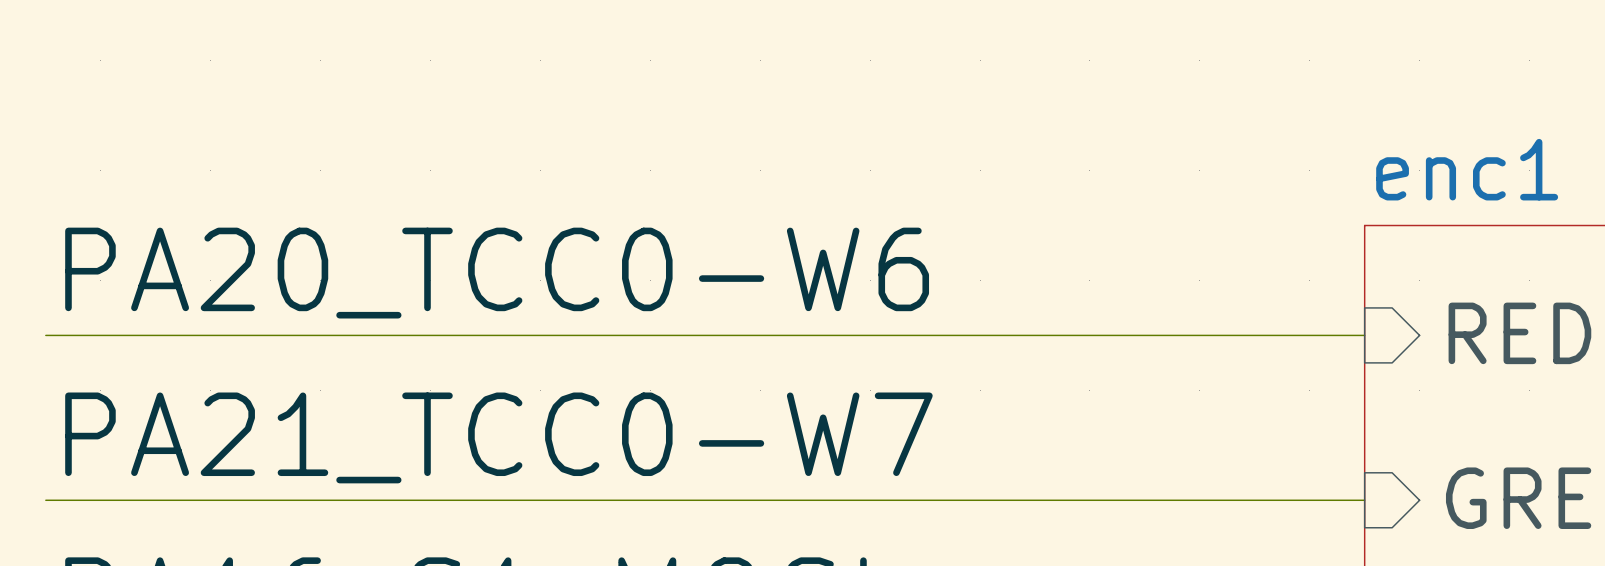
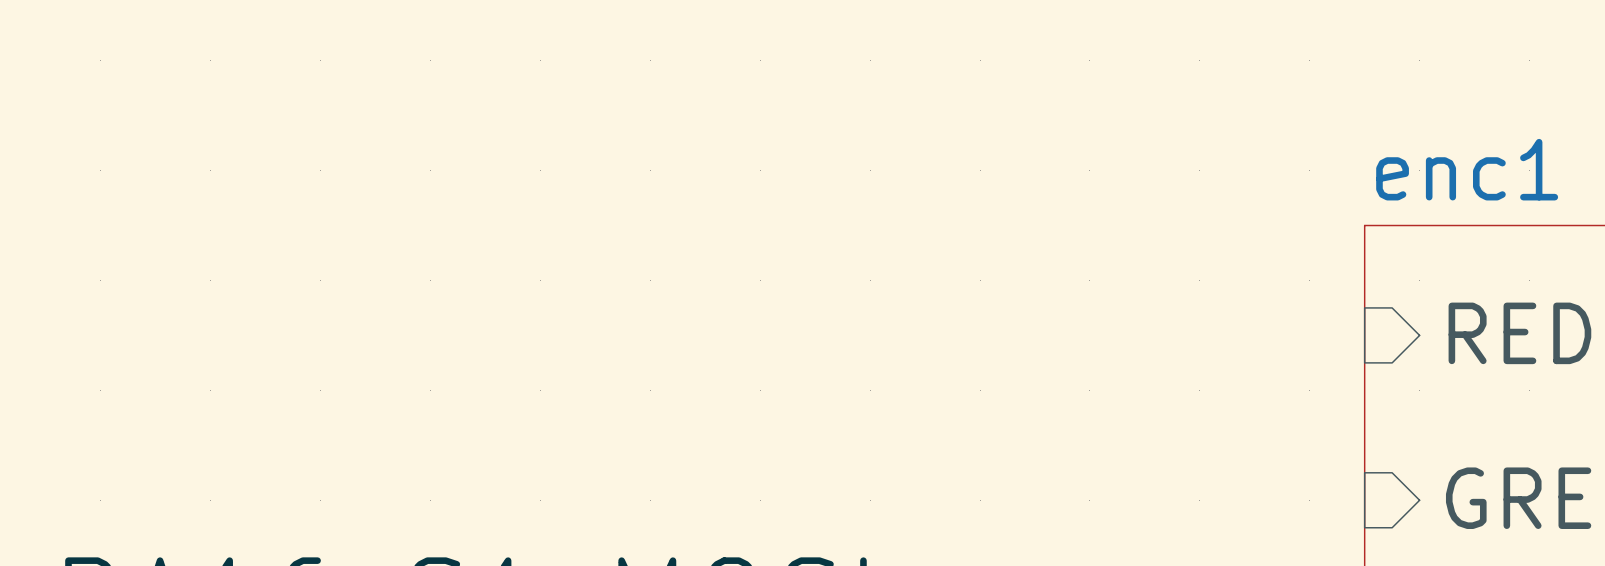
label: PA20_TCC0-W6 (497, 273) -> none
wire: (45, 335) (1364, 335) -> none
label: PA21_TCC0-W7 (498, 437) -> none
wire: (45, 500) (1364, 500) -> none

